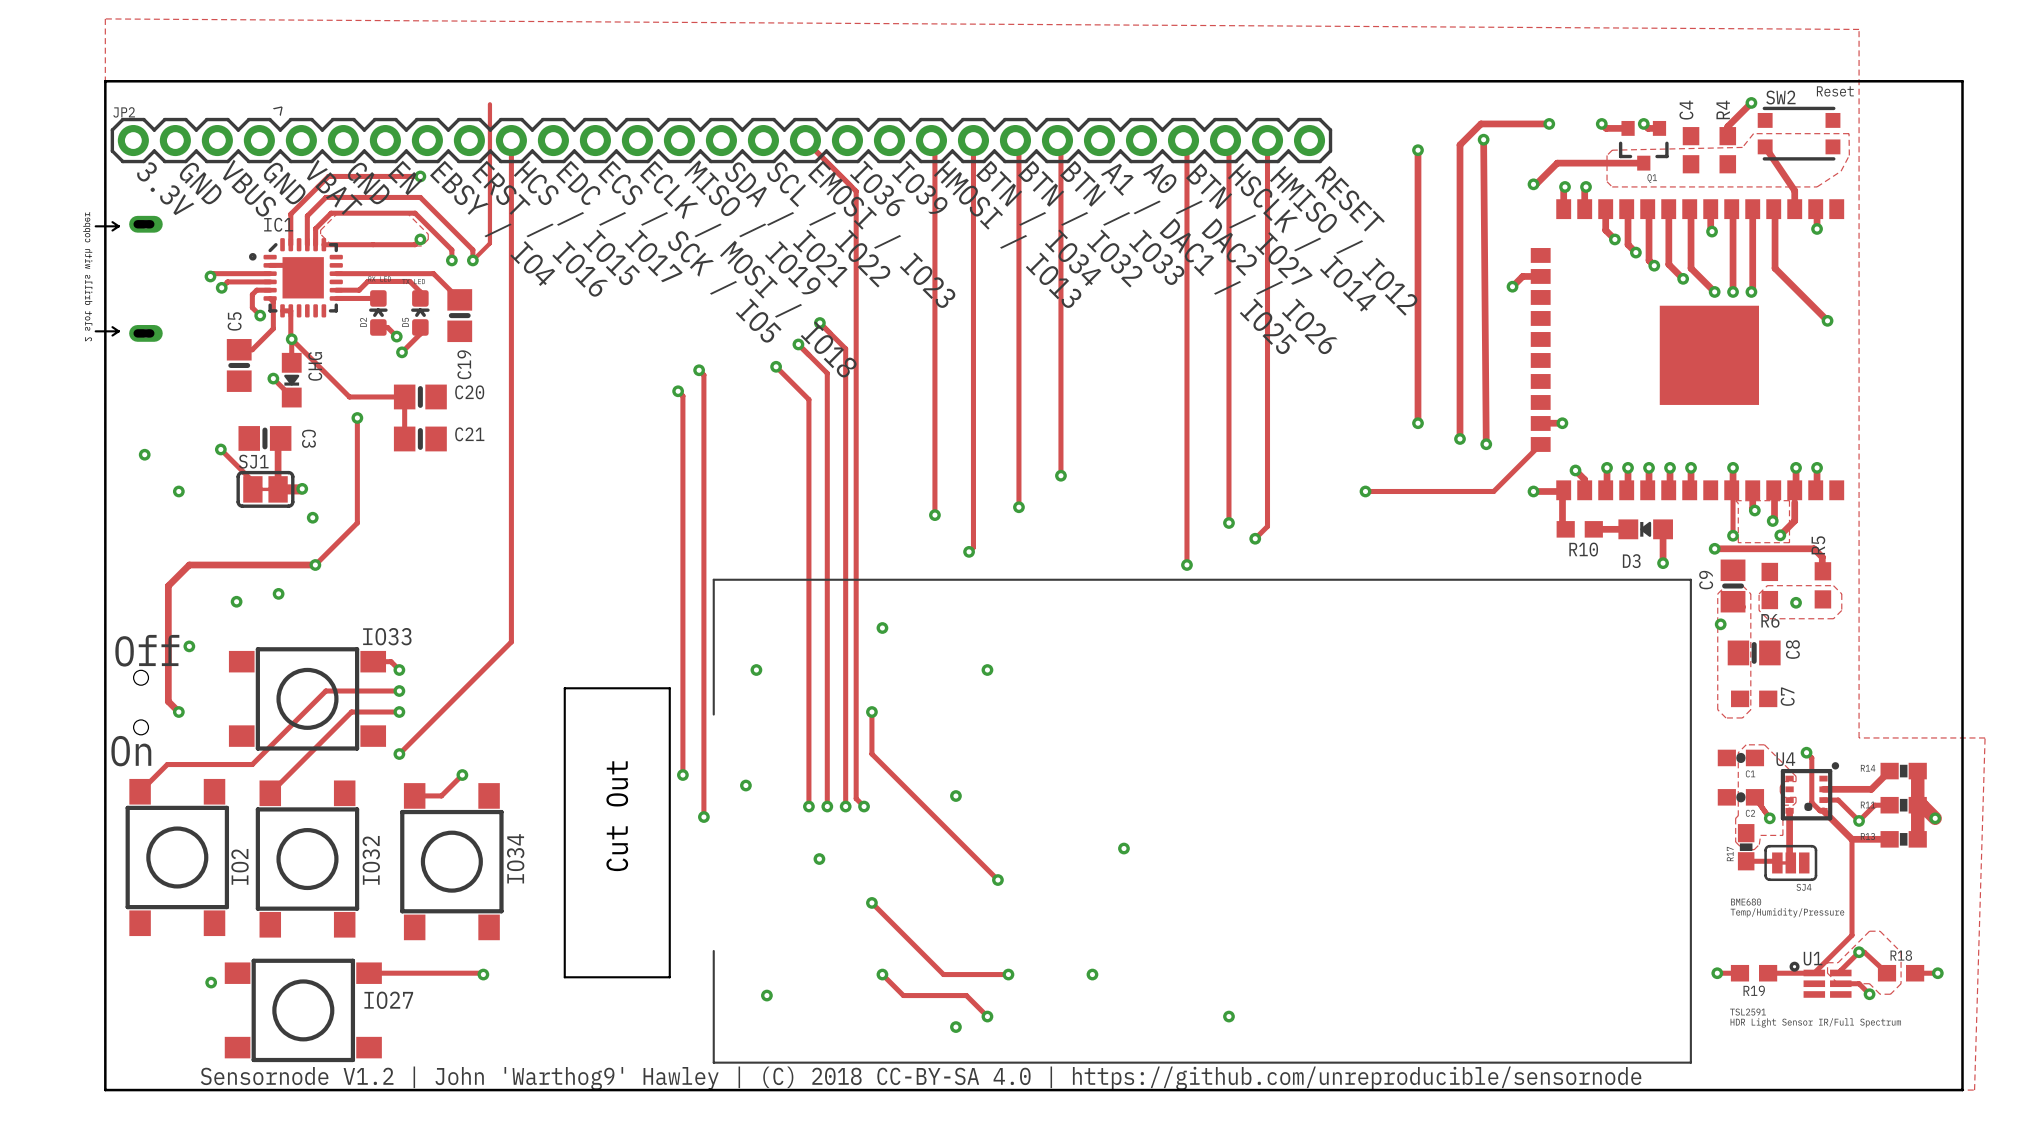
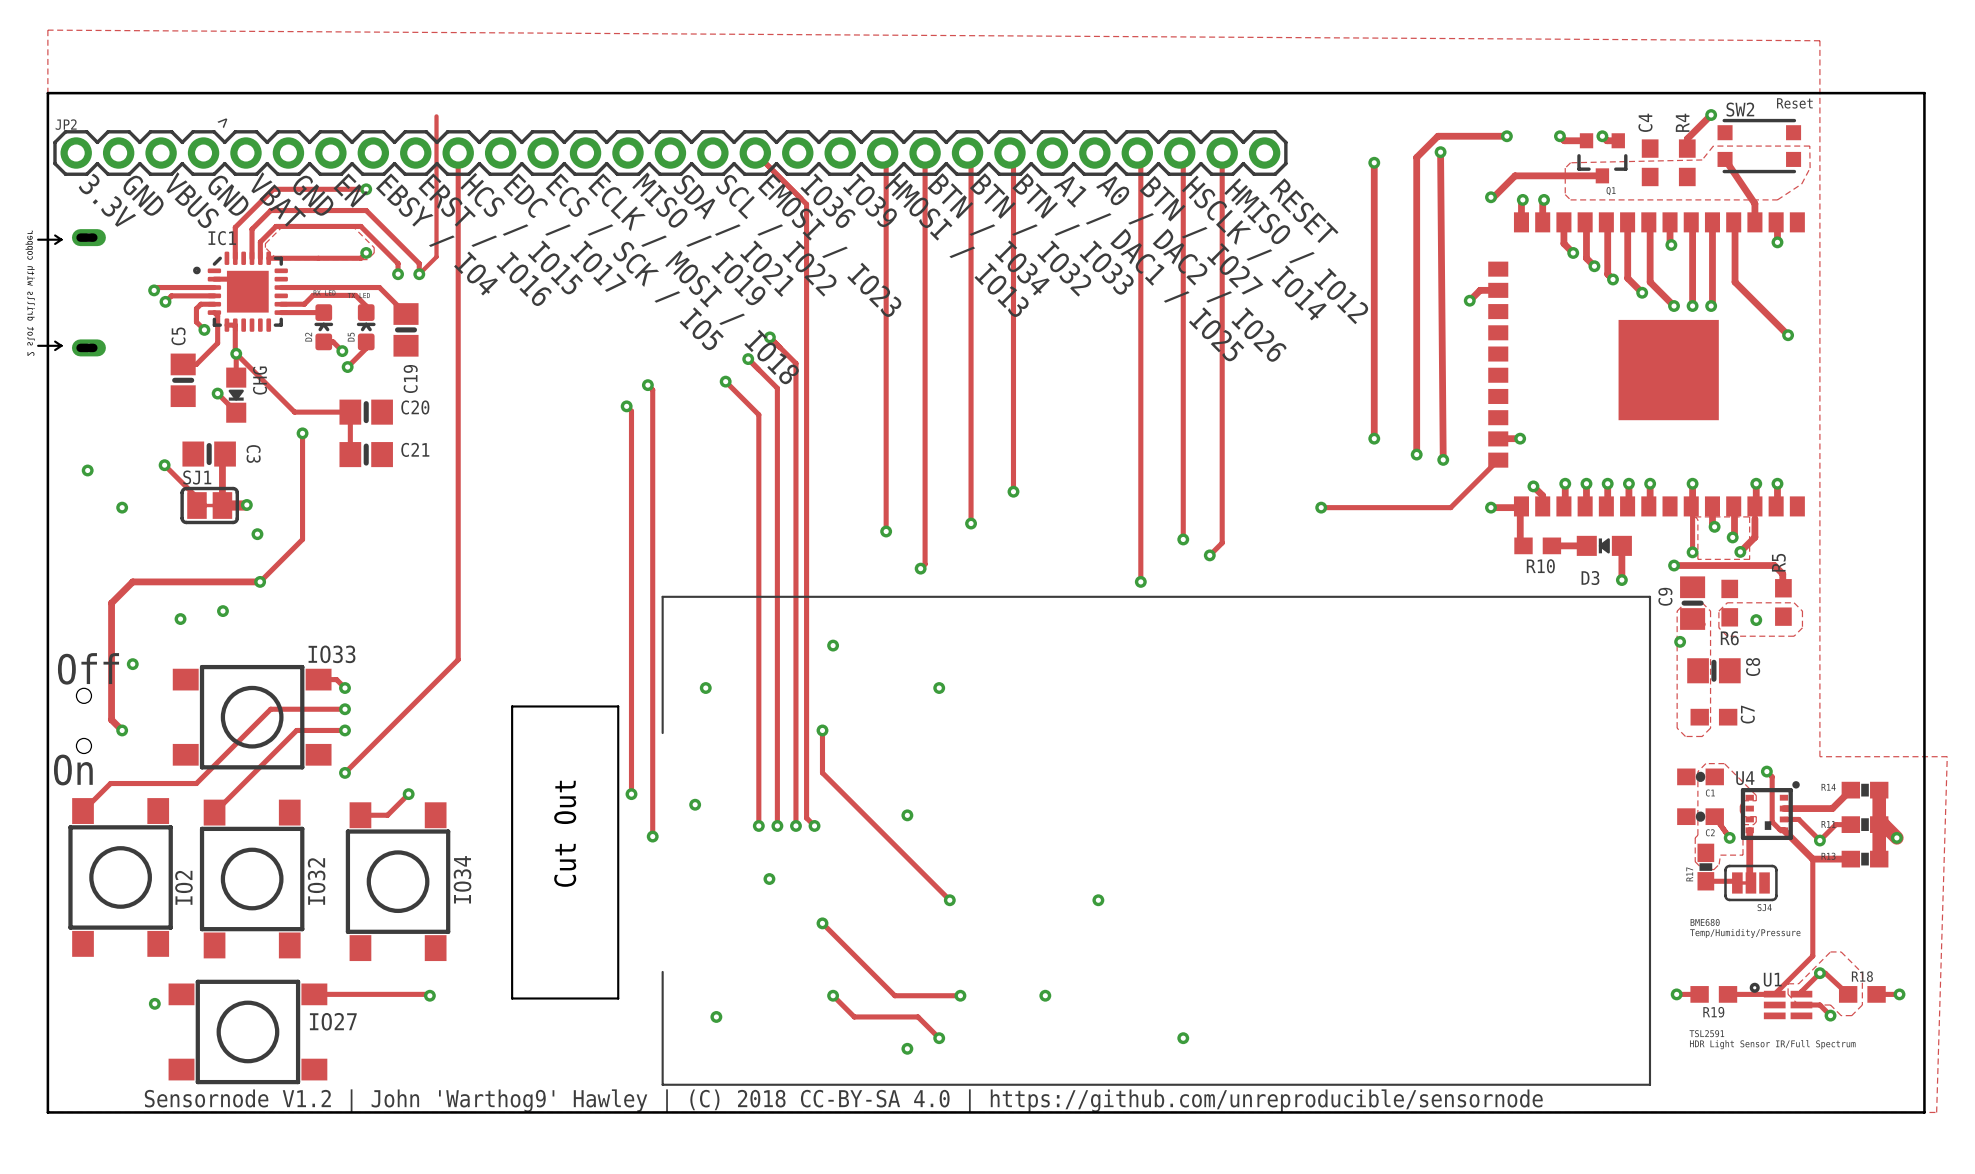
via position: (1123, 848) -> (1098, 900)

